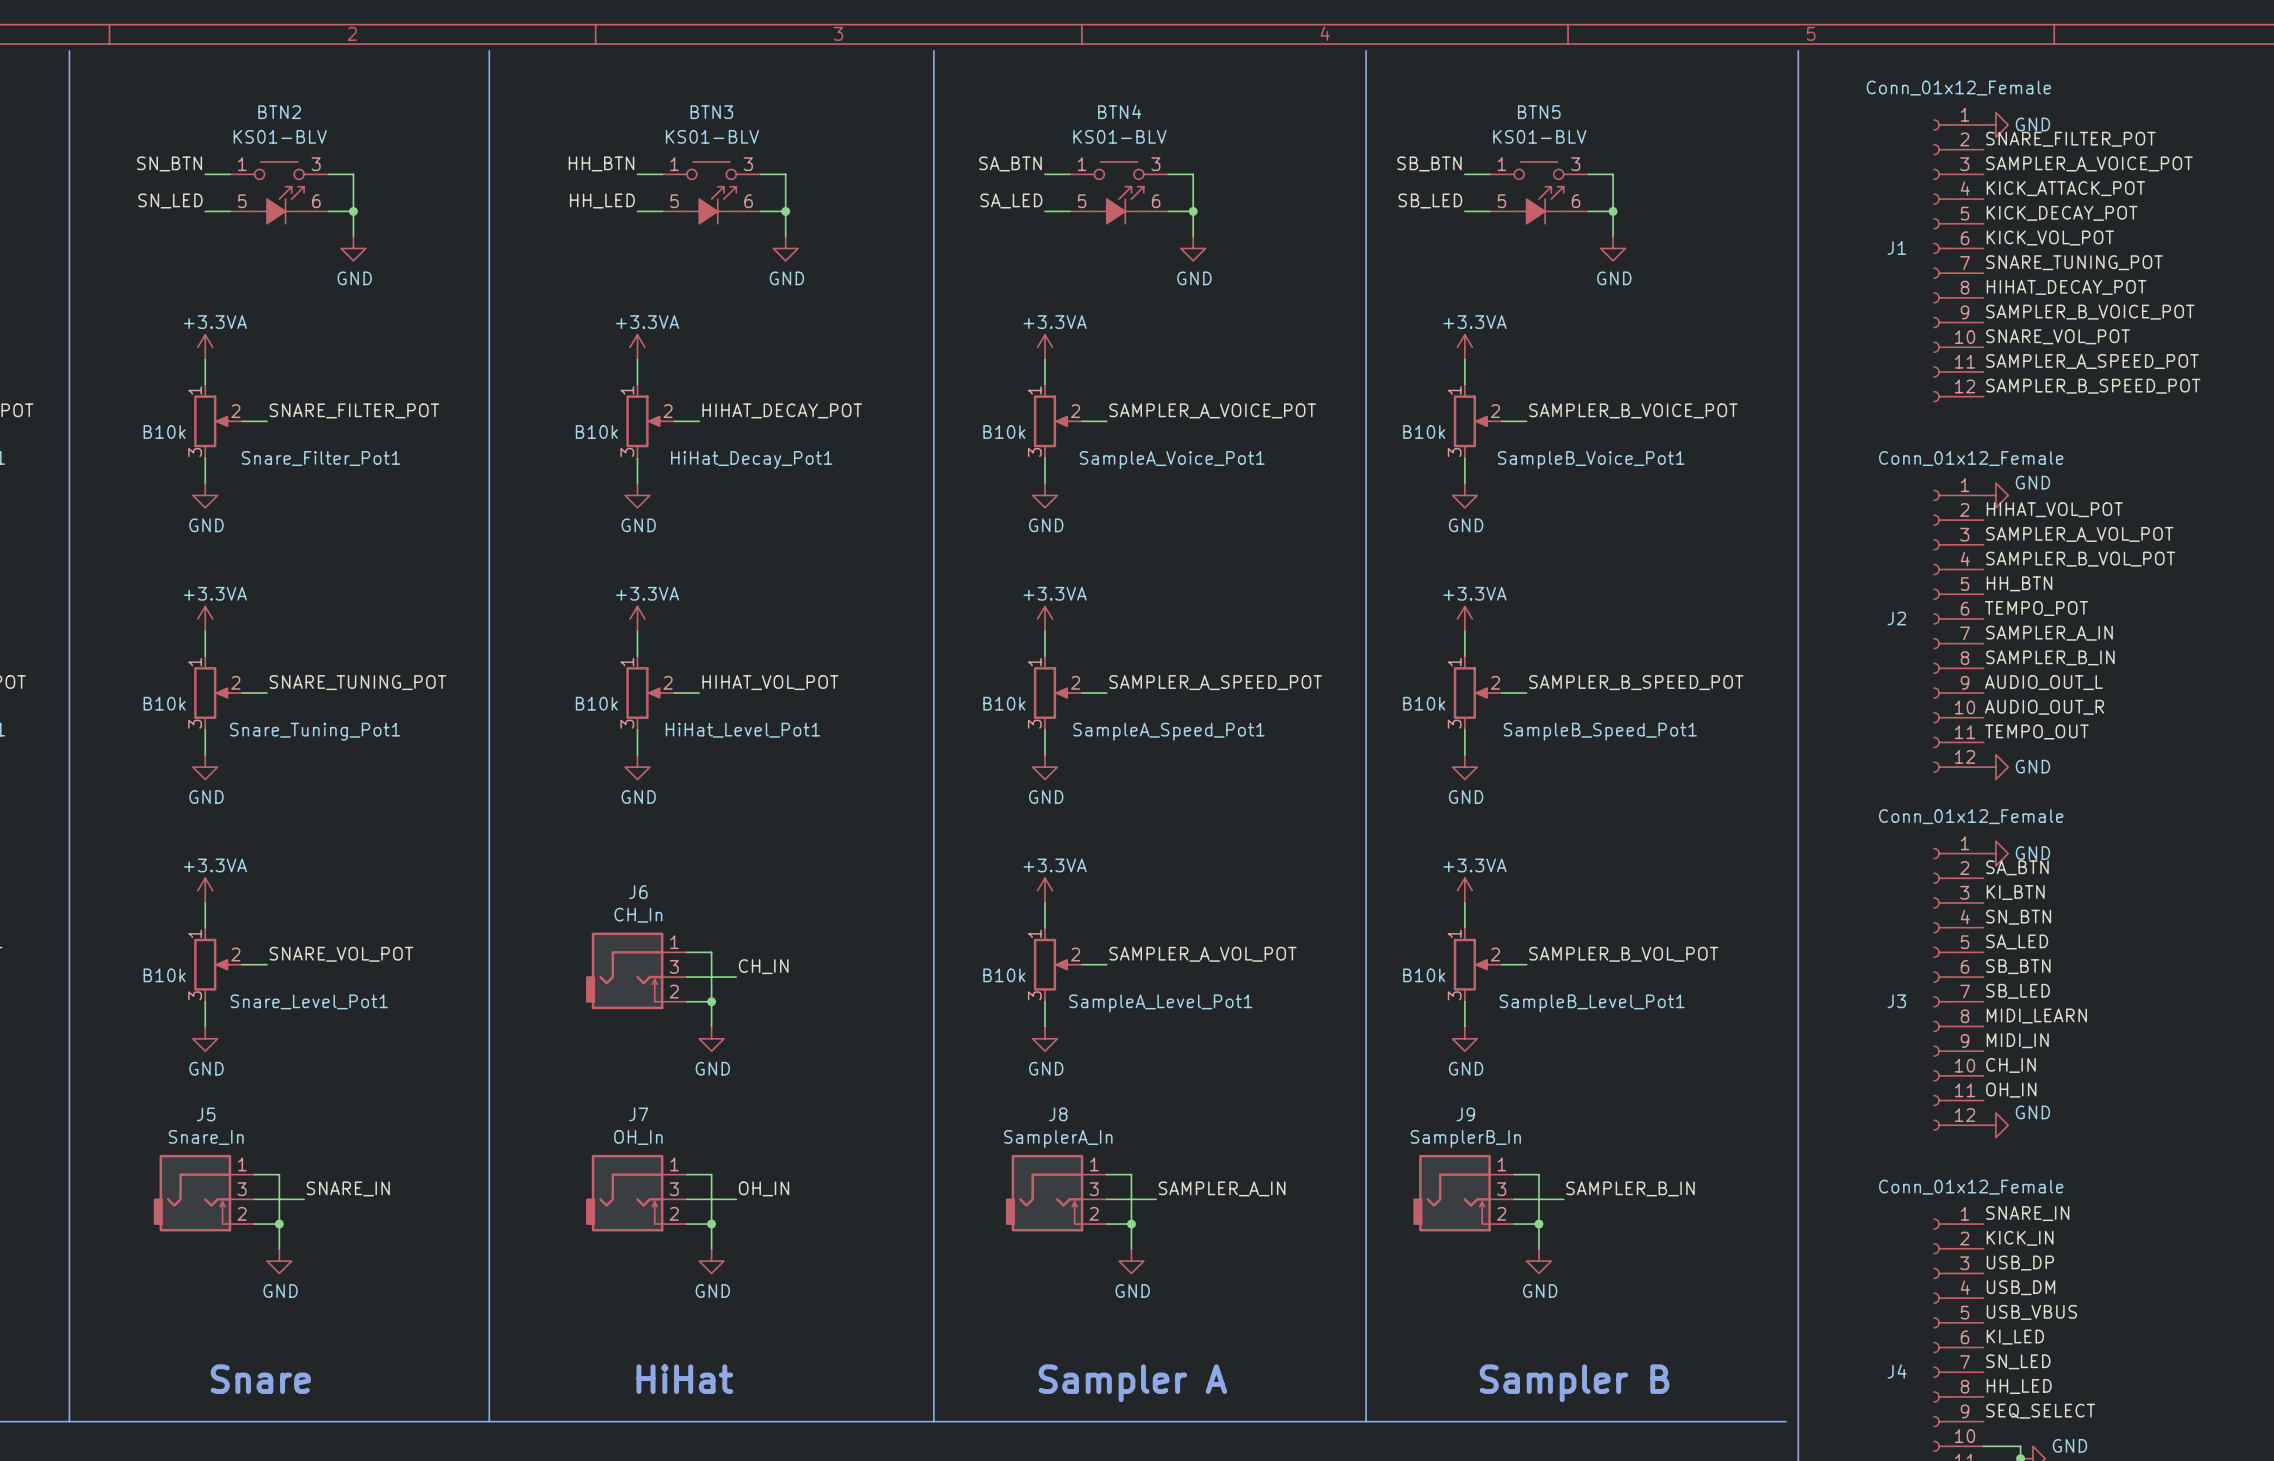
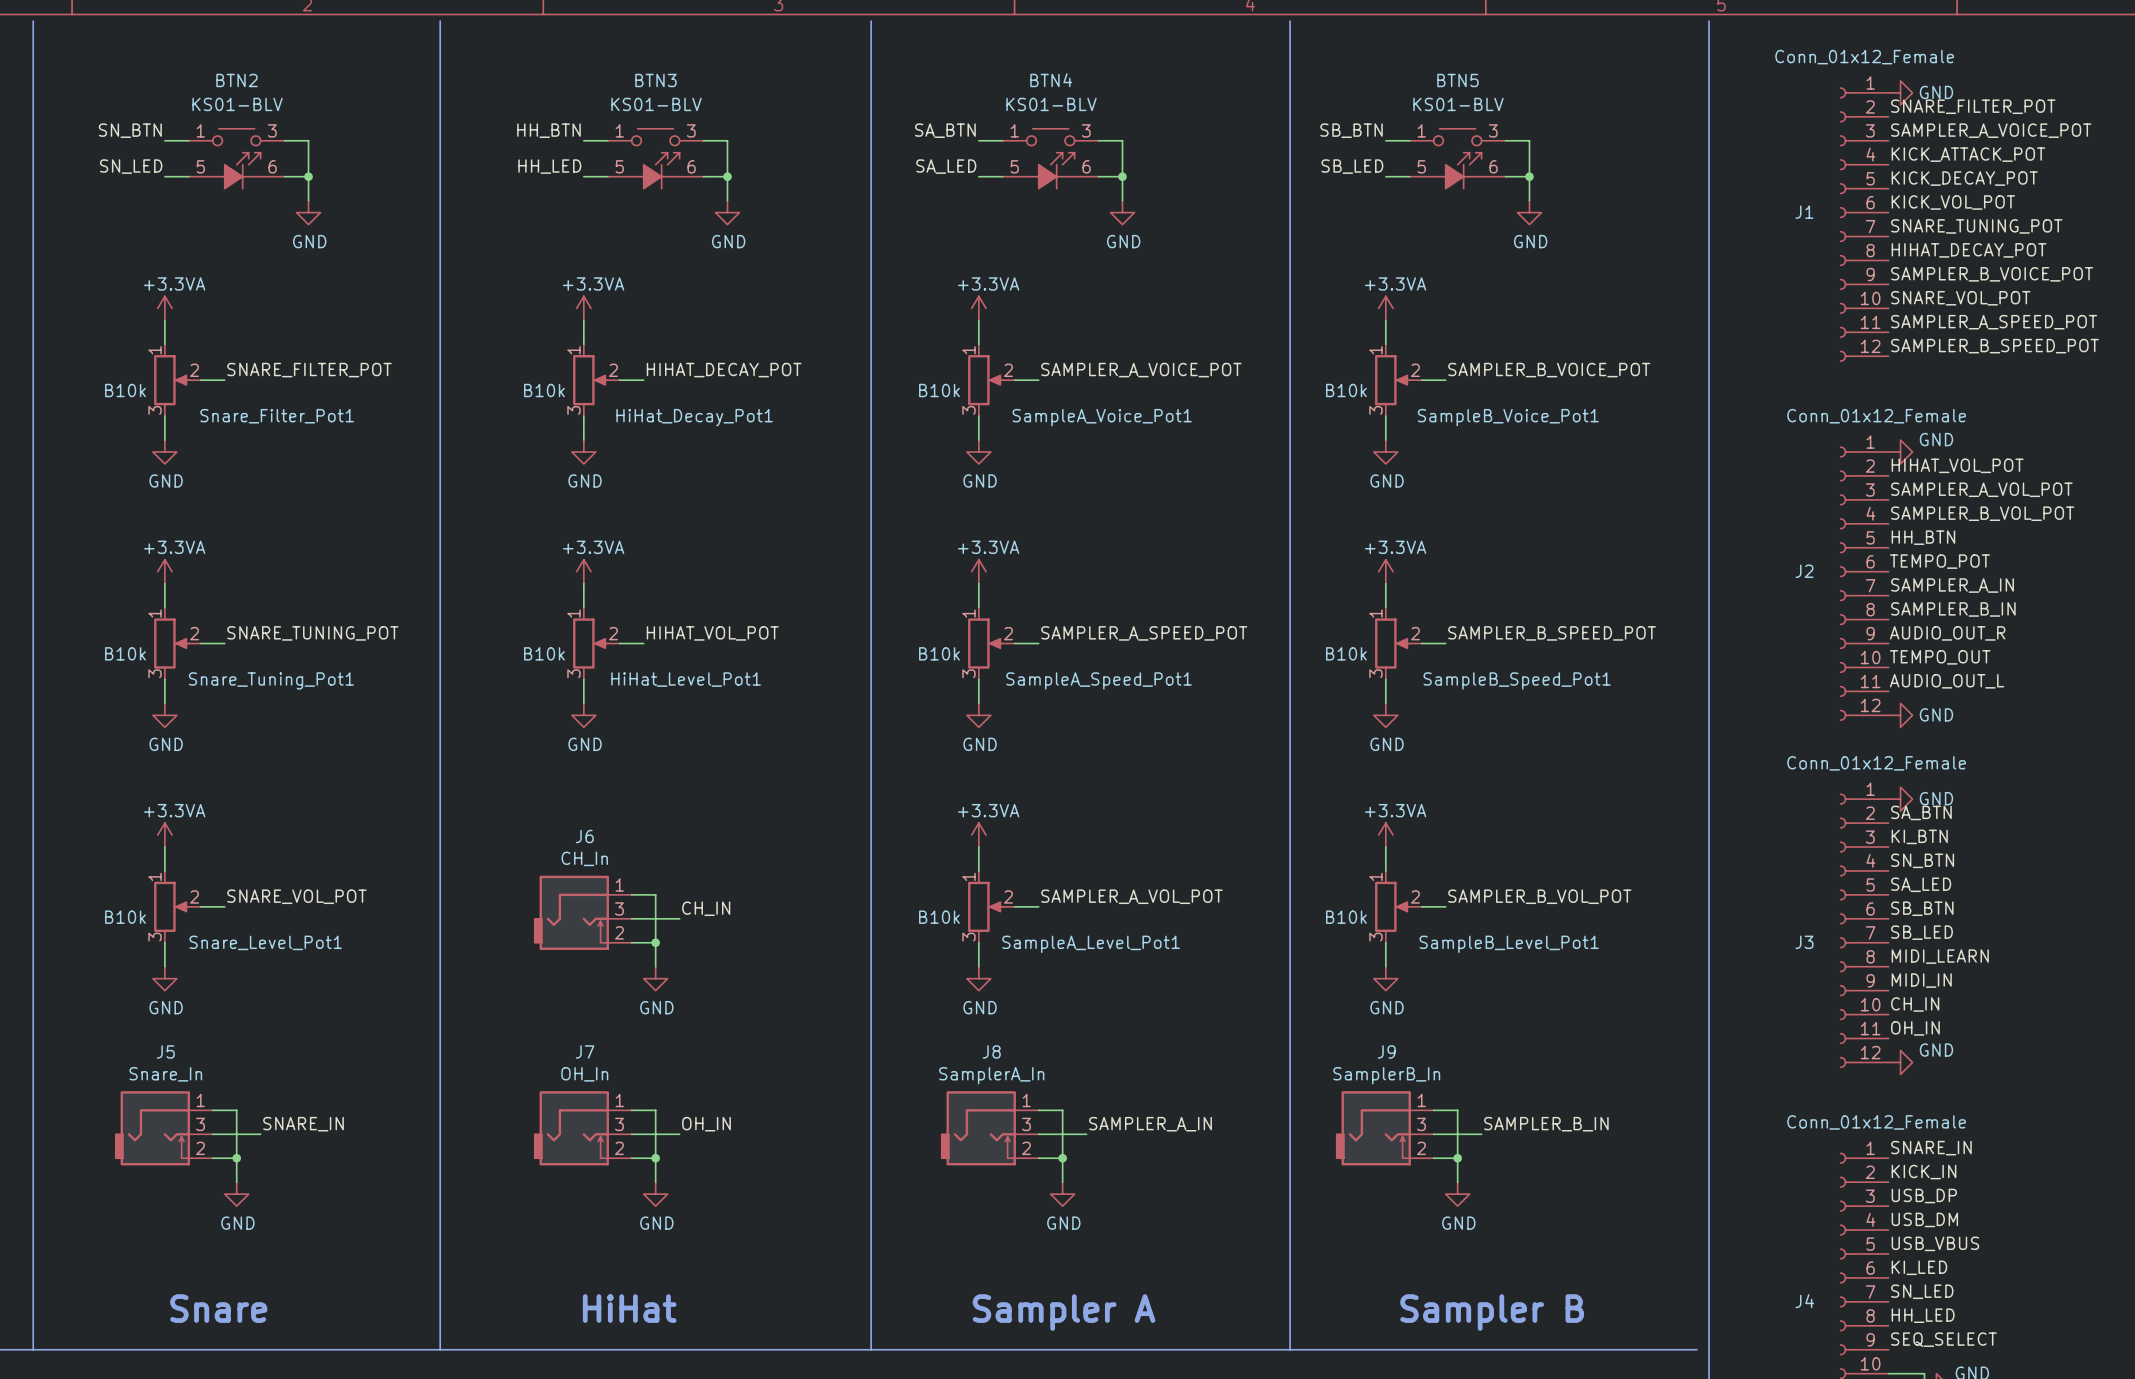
label: AUDIO_OUT_L (2043, 682) -> AUDIO_OUT_R (1947, 633)
label: AUDIO_OUT_R (2044, 707) -> TEMPO_OUT (1940, 657)
label: TEMPO_OUT (2036, 731) -> AUDIO_OUT_L (1947, 681)

